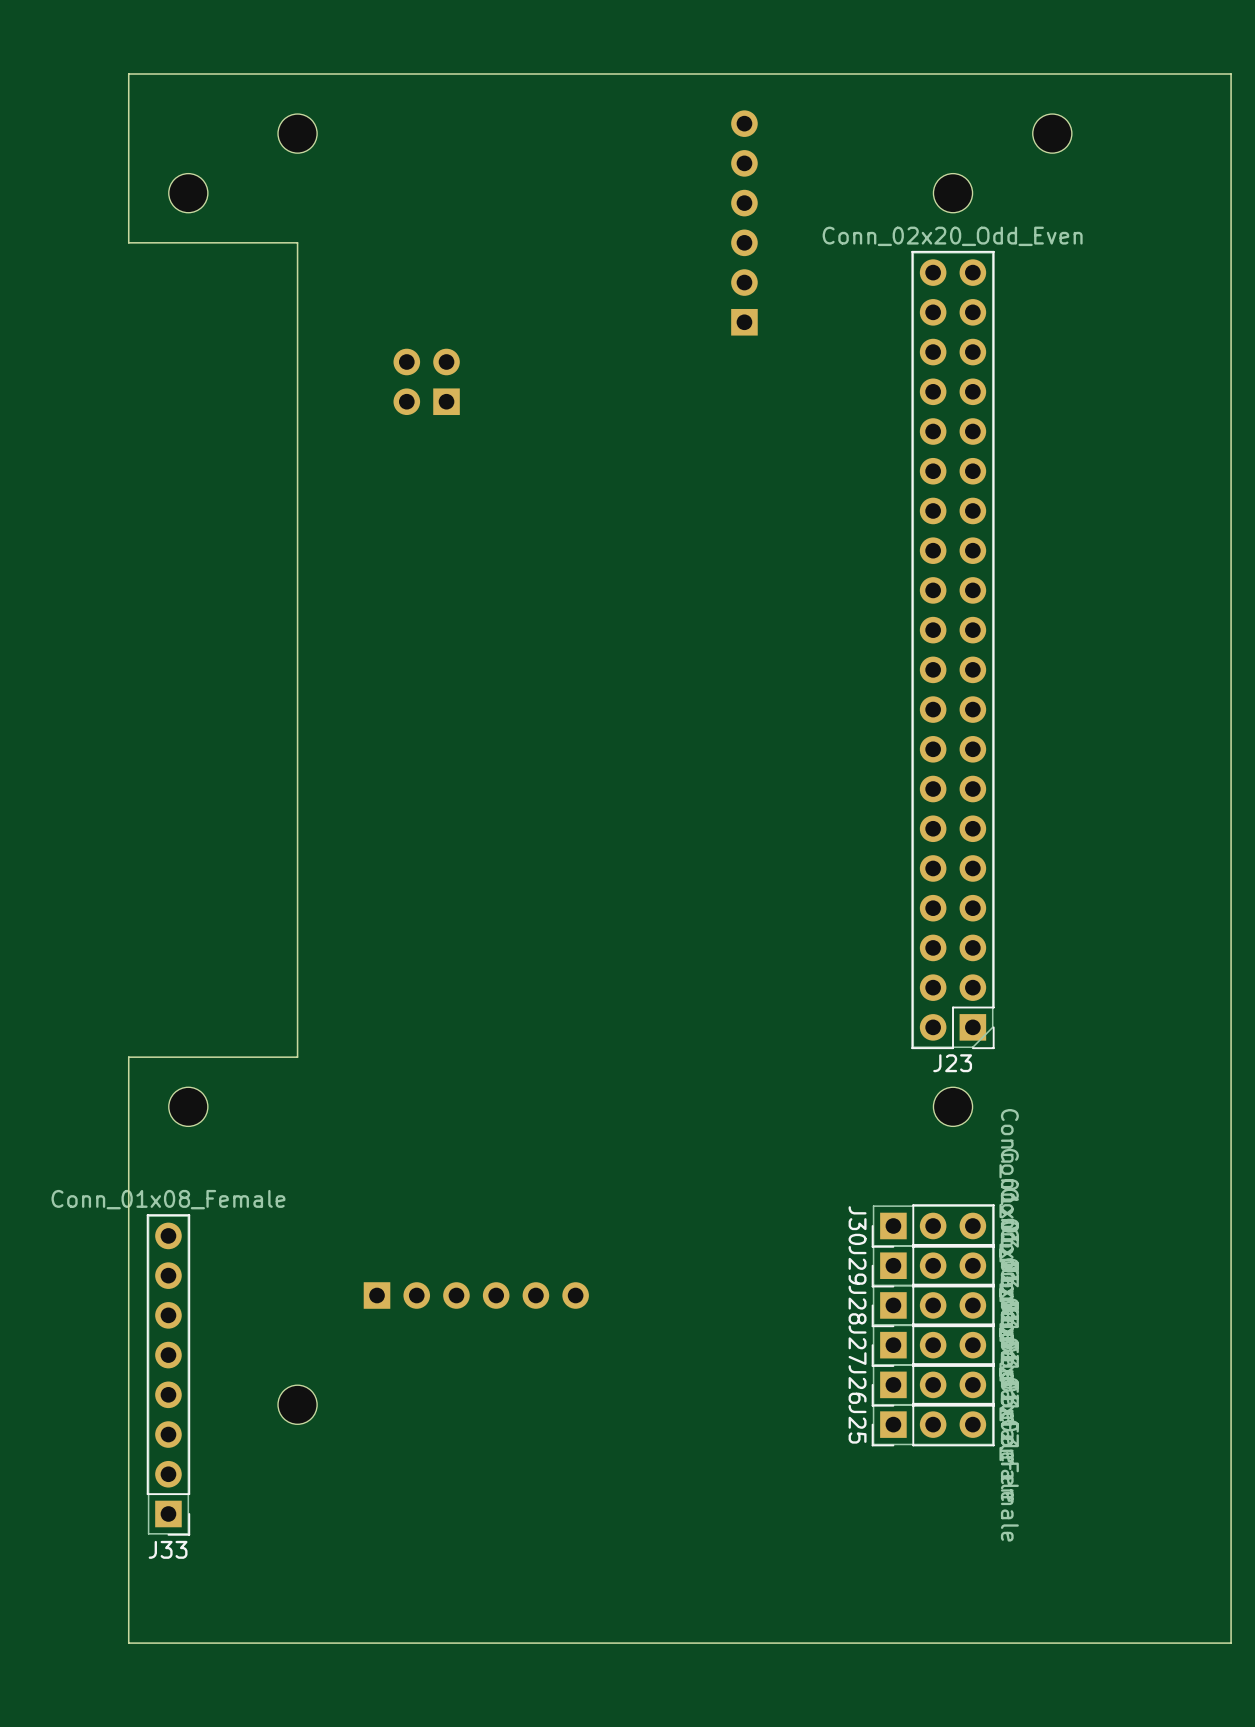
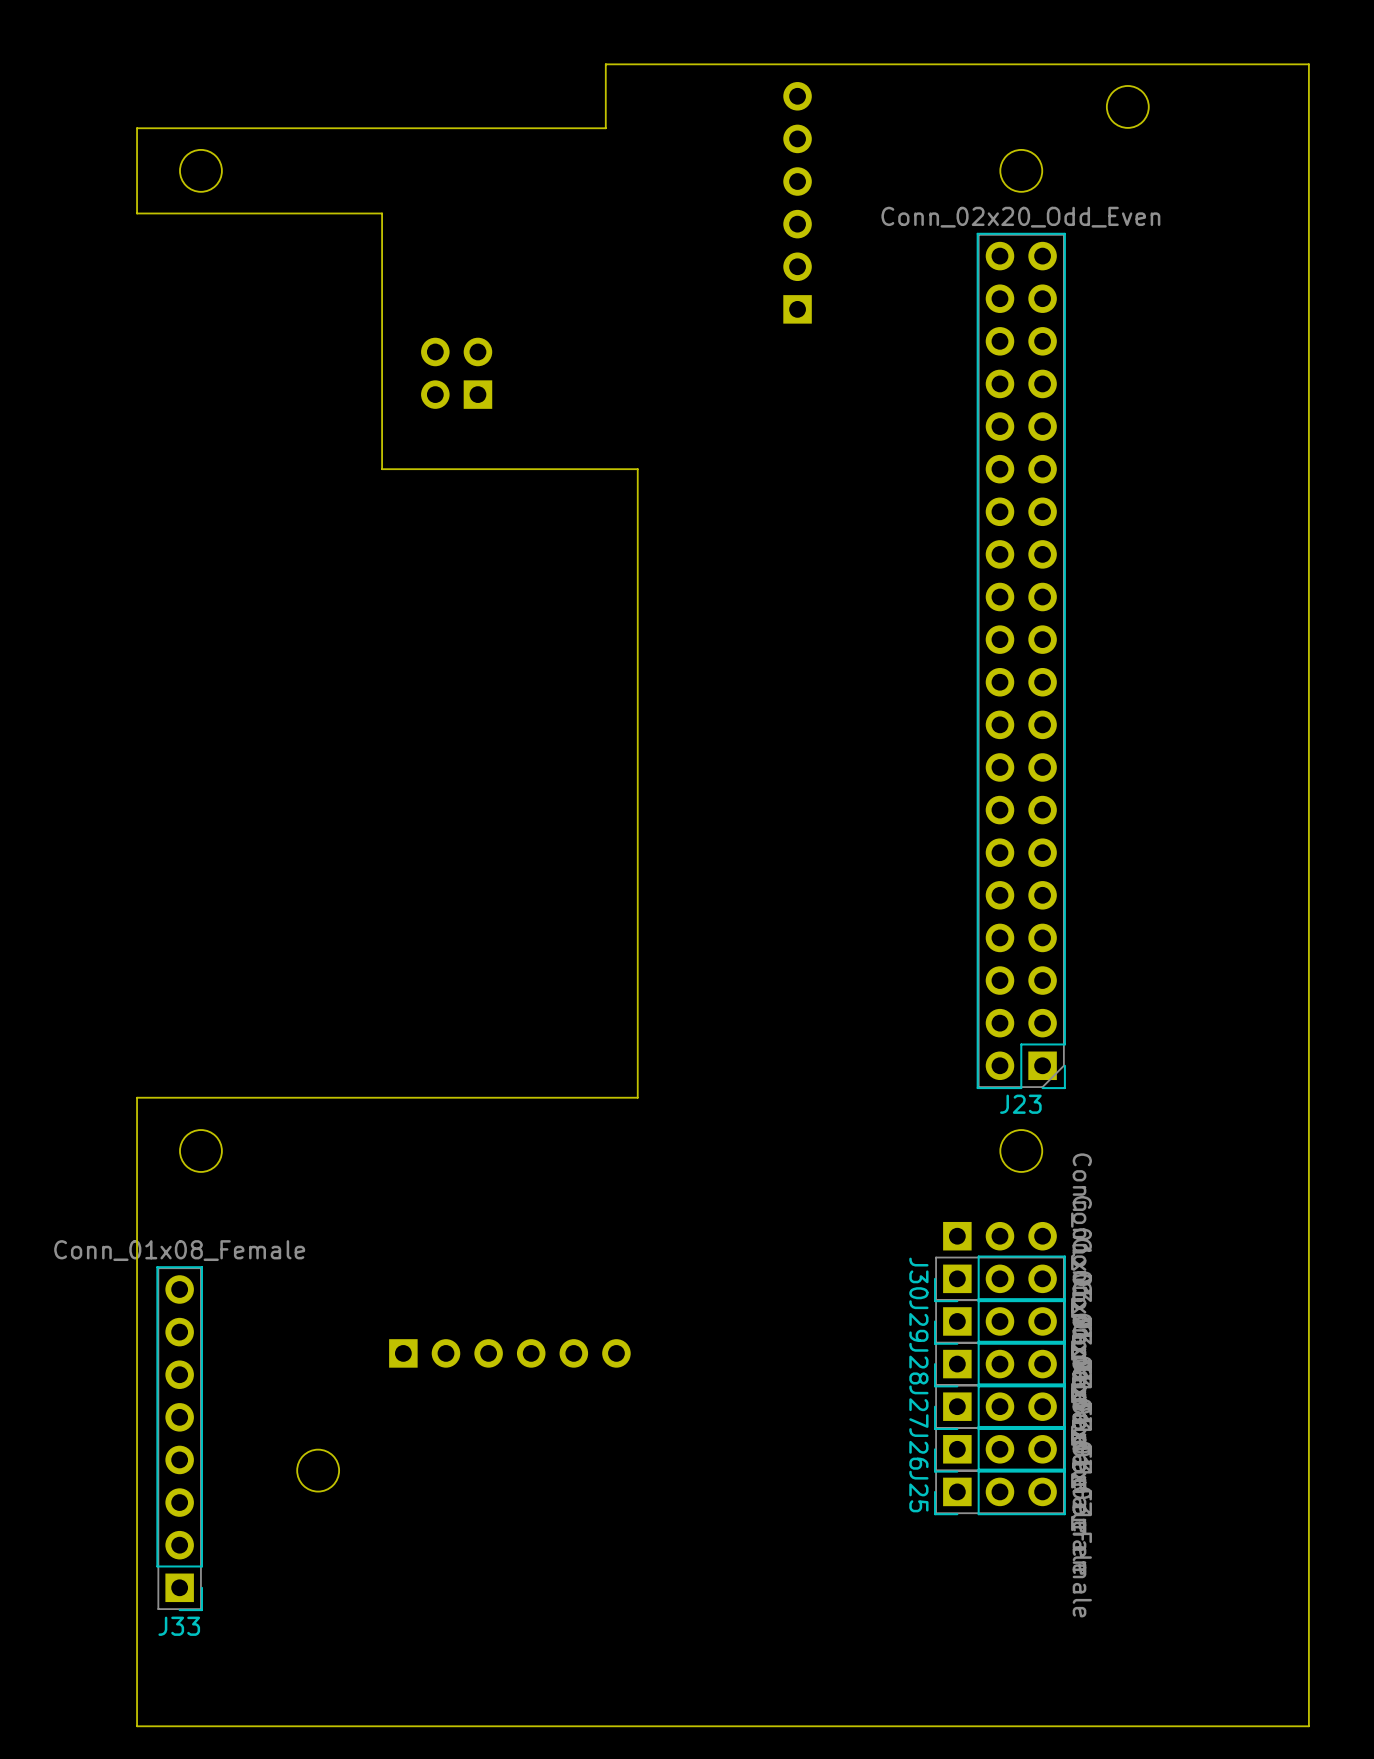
part: (297, 133) -> none
board edge: (128, 153) (128, 74) (1231, 74) (1231, 1643) (1221, 1643) -> (137, 128) (605, 128) (605, 64) (1308, 64) (1308, 1726)
board edge: (128, 232) (128, 242) (297, 242) (297, 1057) -> (137, 213) (382, 213) (382, 469) (637, 469) (637, 1097) (318, 1097)
part: none -> (999, 1236)

